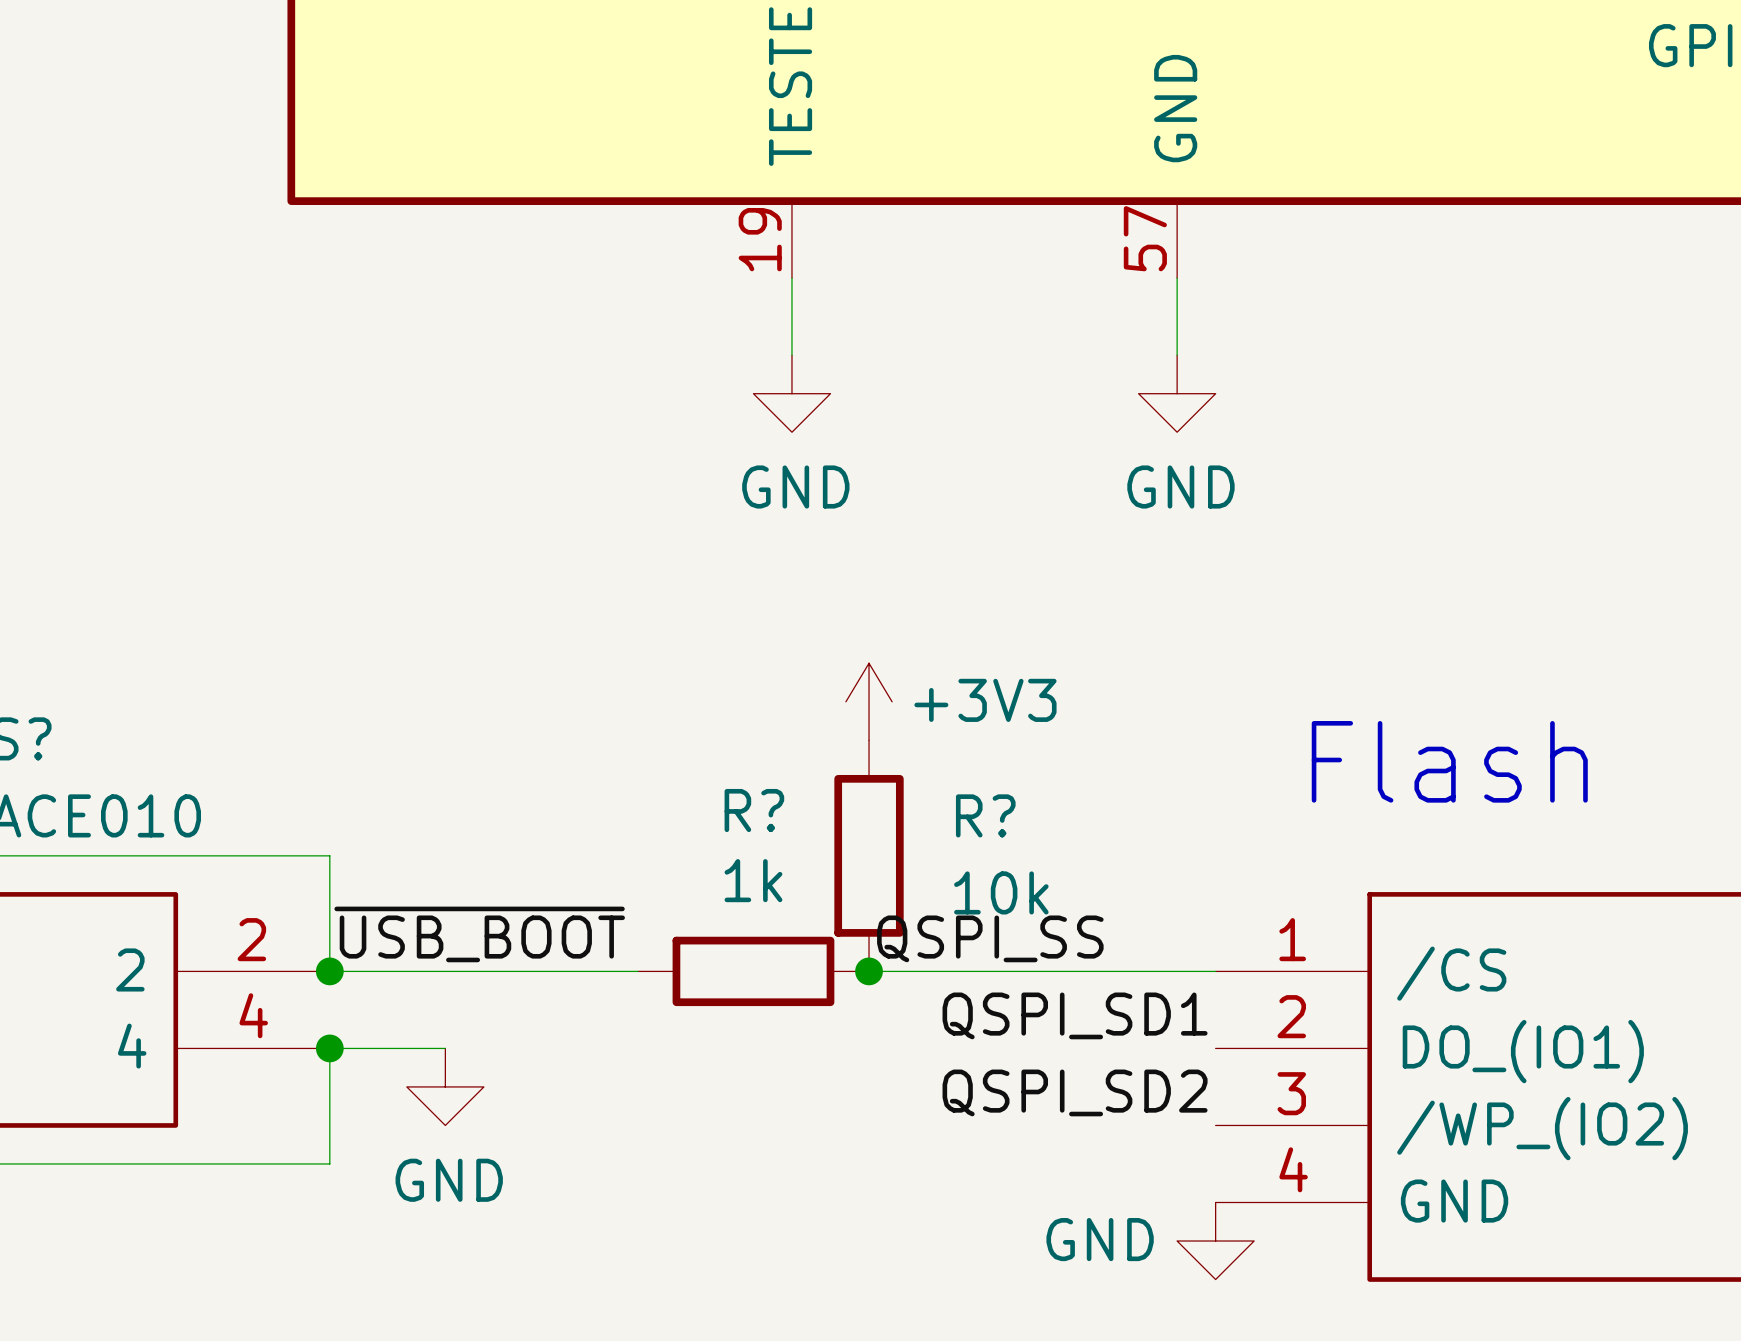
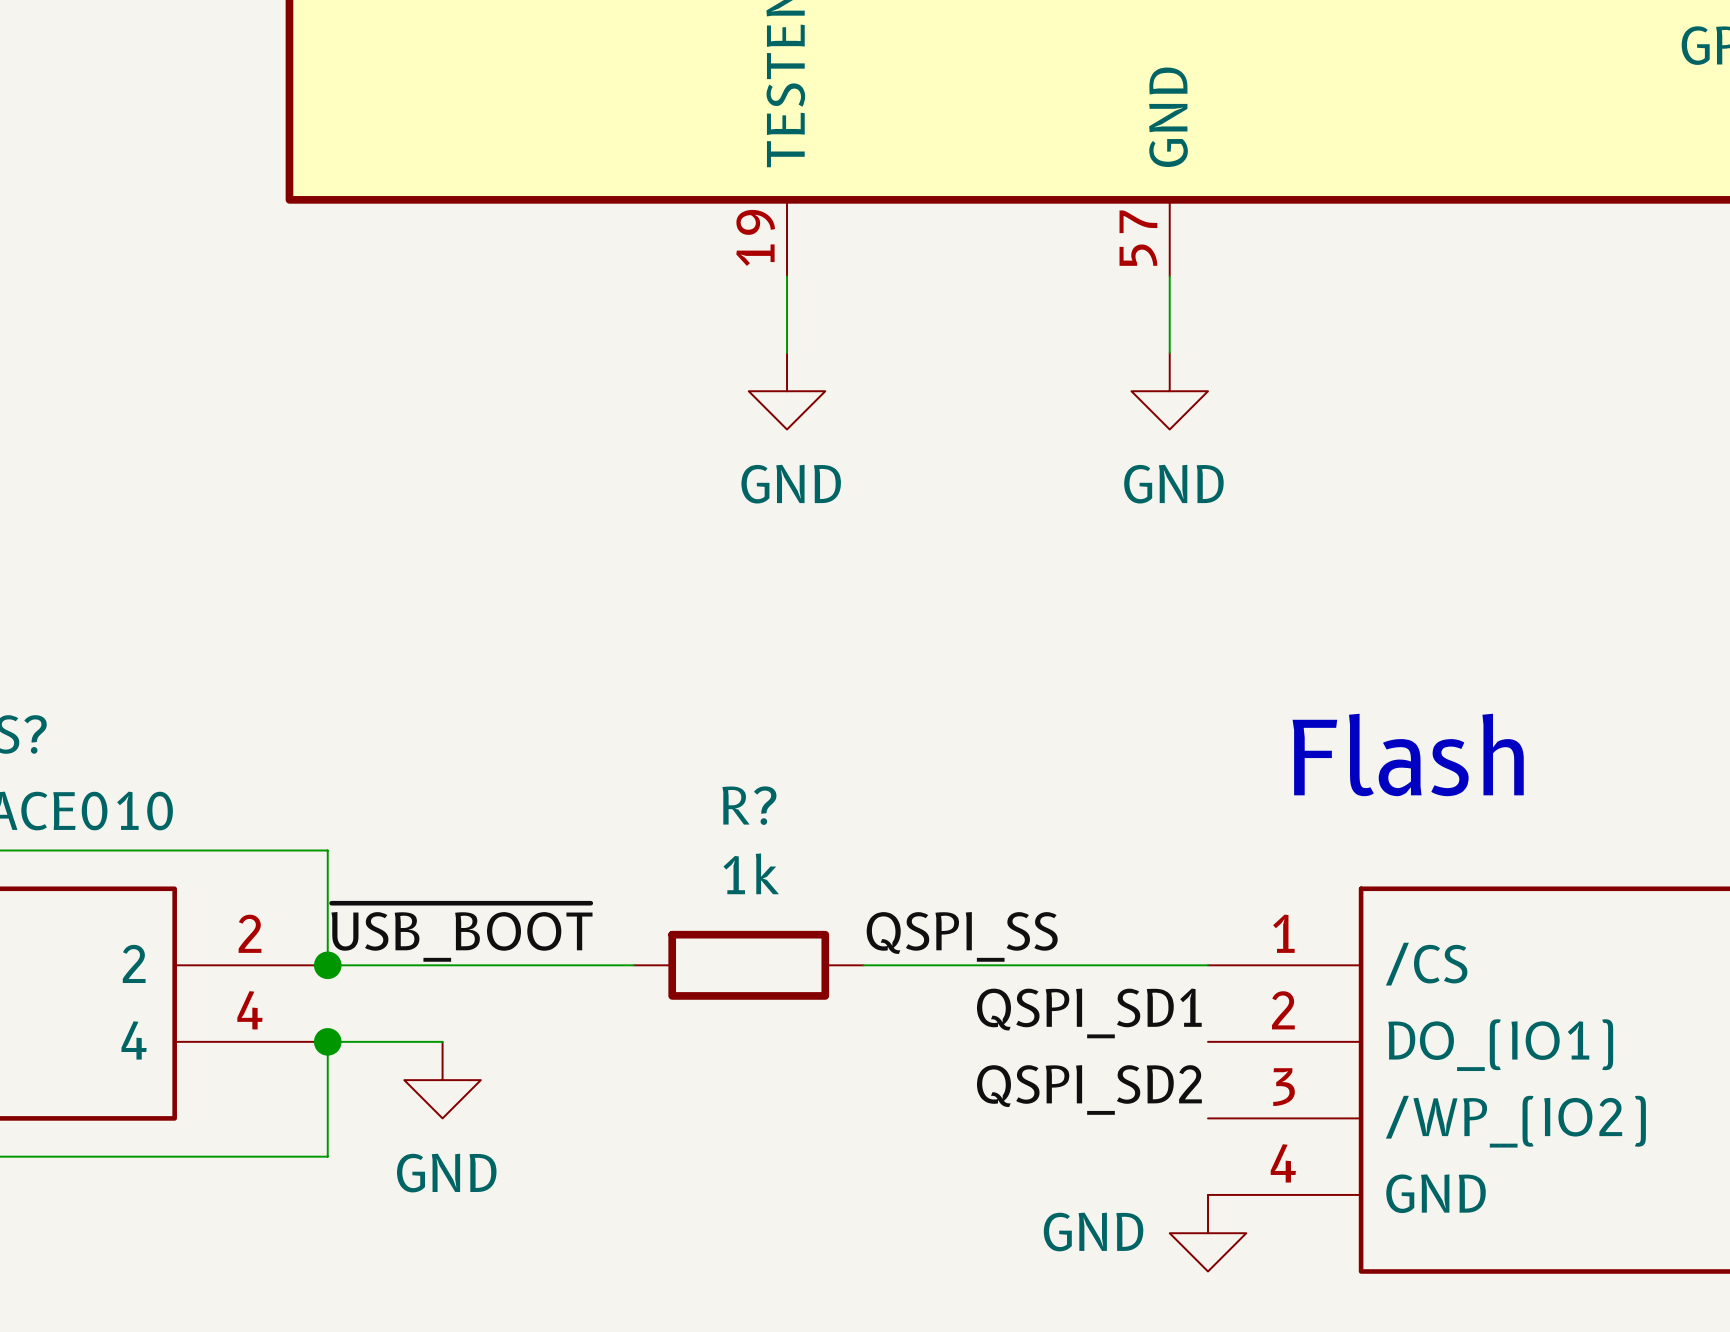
power symbol: +3V3 (869, 701) -> none
R?: 10k (869, 855) -> none
junction: (869, 971) -> none

